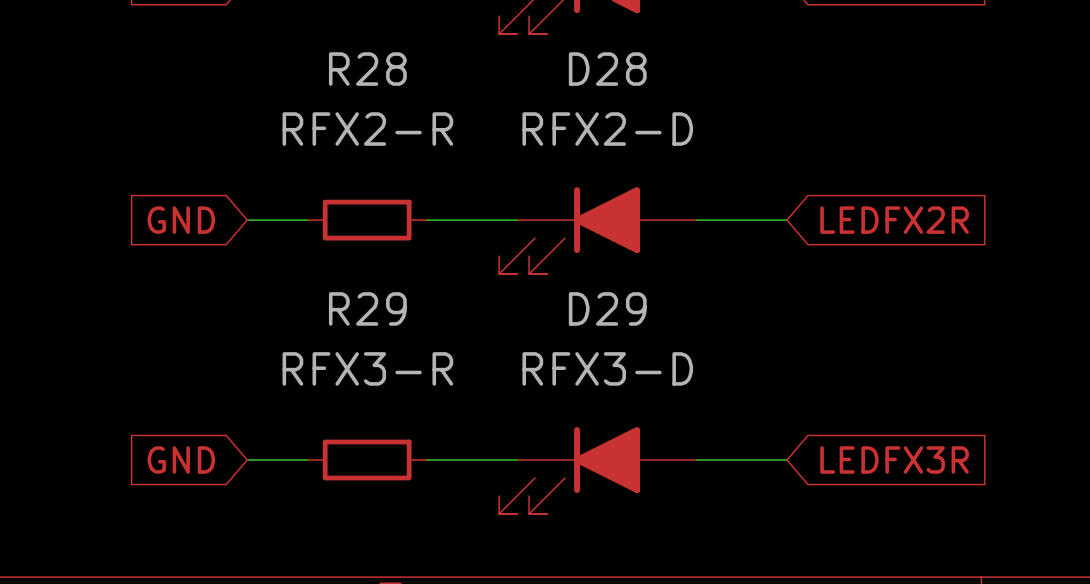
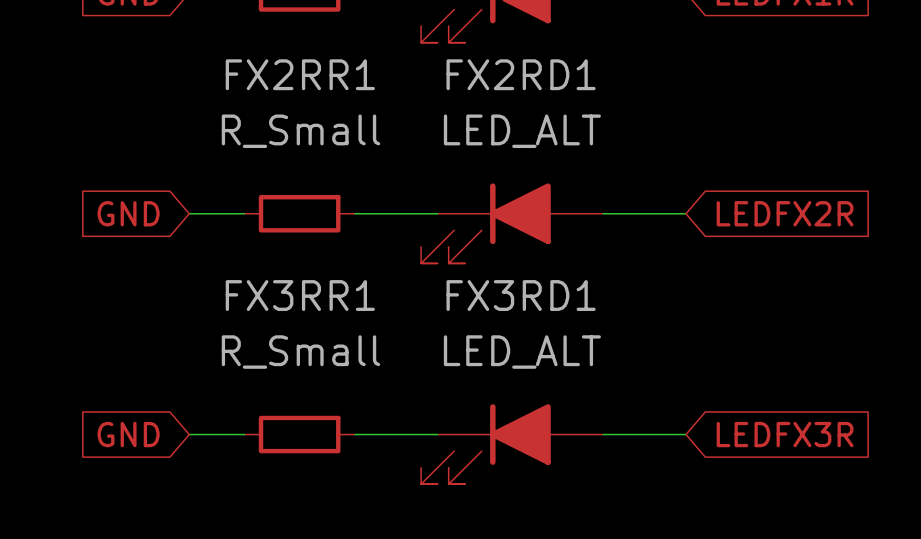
R28 name: R28 (367, 69) -> FX2RR1 (300, 74)
D28 name: D28 (607, 69) -> FX2RD1 (521, 74)
R28 value: RFX2-R (367, 129) -> R_Small (300, 131)
D28 value: RFX2-D (607, 129) -> LED_ALT (522, 131)
R29 name: R29 (367, 308) -> FX3RR1 (300, 295)
D29 name: D29 (607, 308) -> FX3RD1 (521, 295)
R29 value: RFX3-R (367, 368) -> R_Small (300, 352)
D29 value: RFX3-D (607, 368) -> LED_ALT (522, 352)

